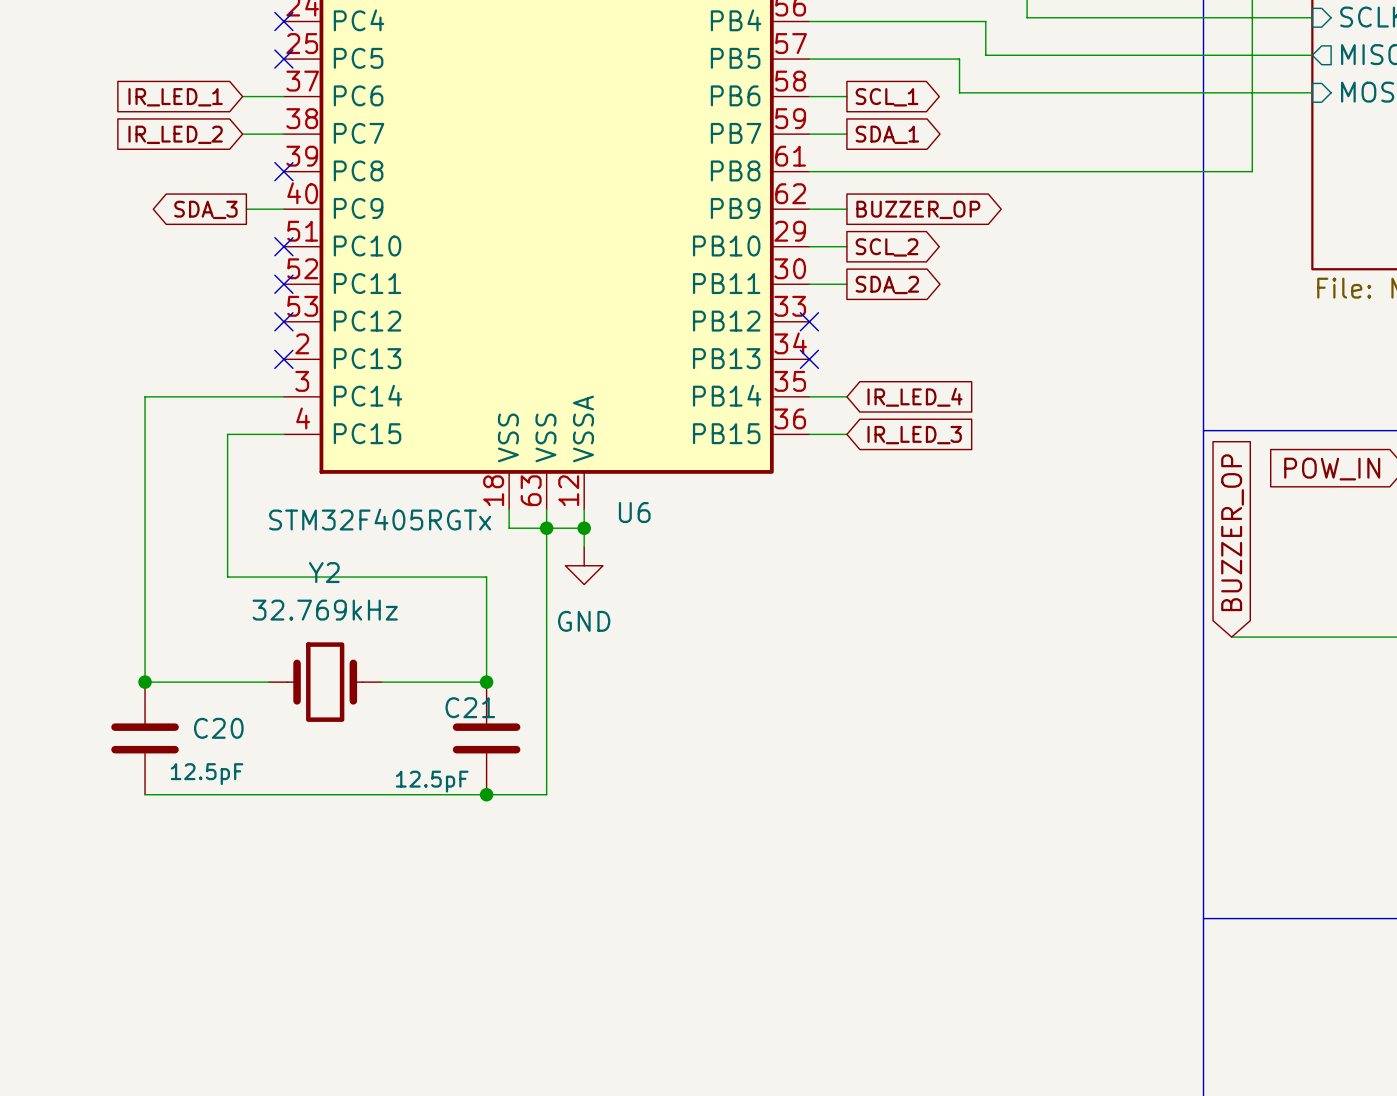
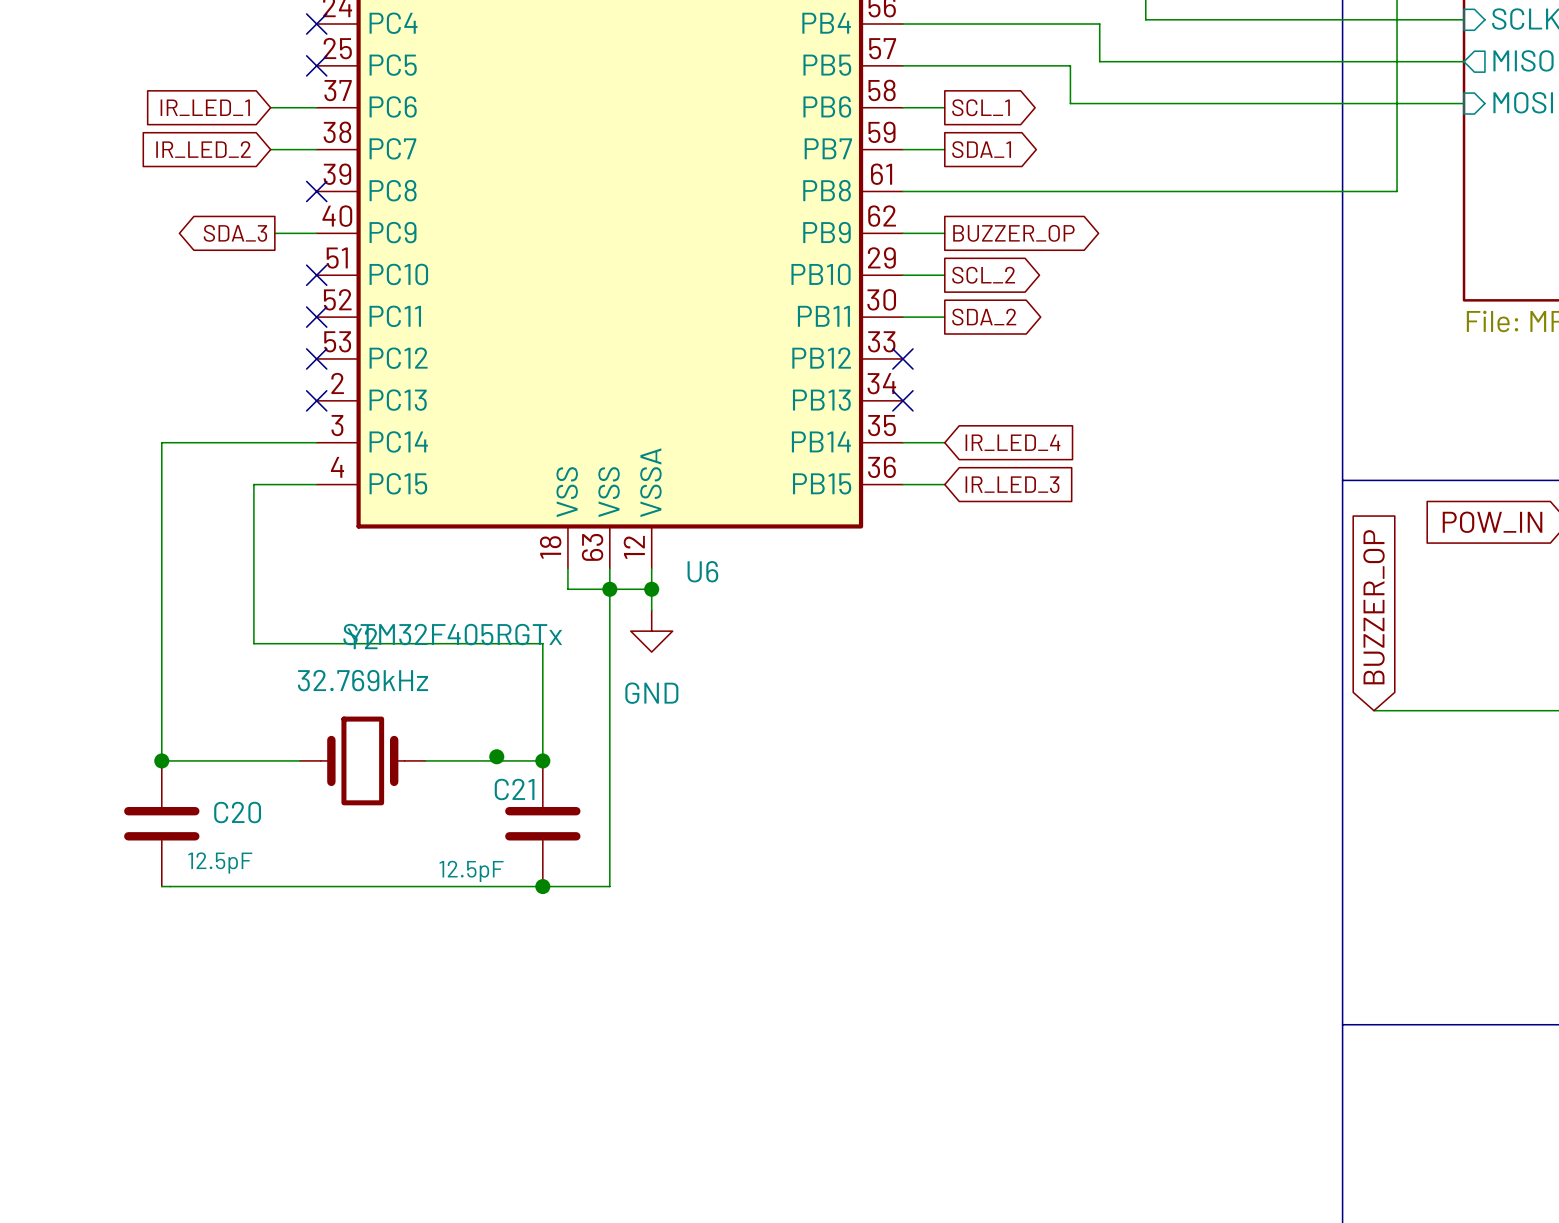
U6 value position: STM32F405RGTx (380, 519) -> STM32F405RGTx (452, 634)
junction: none -> (496, 756)

